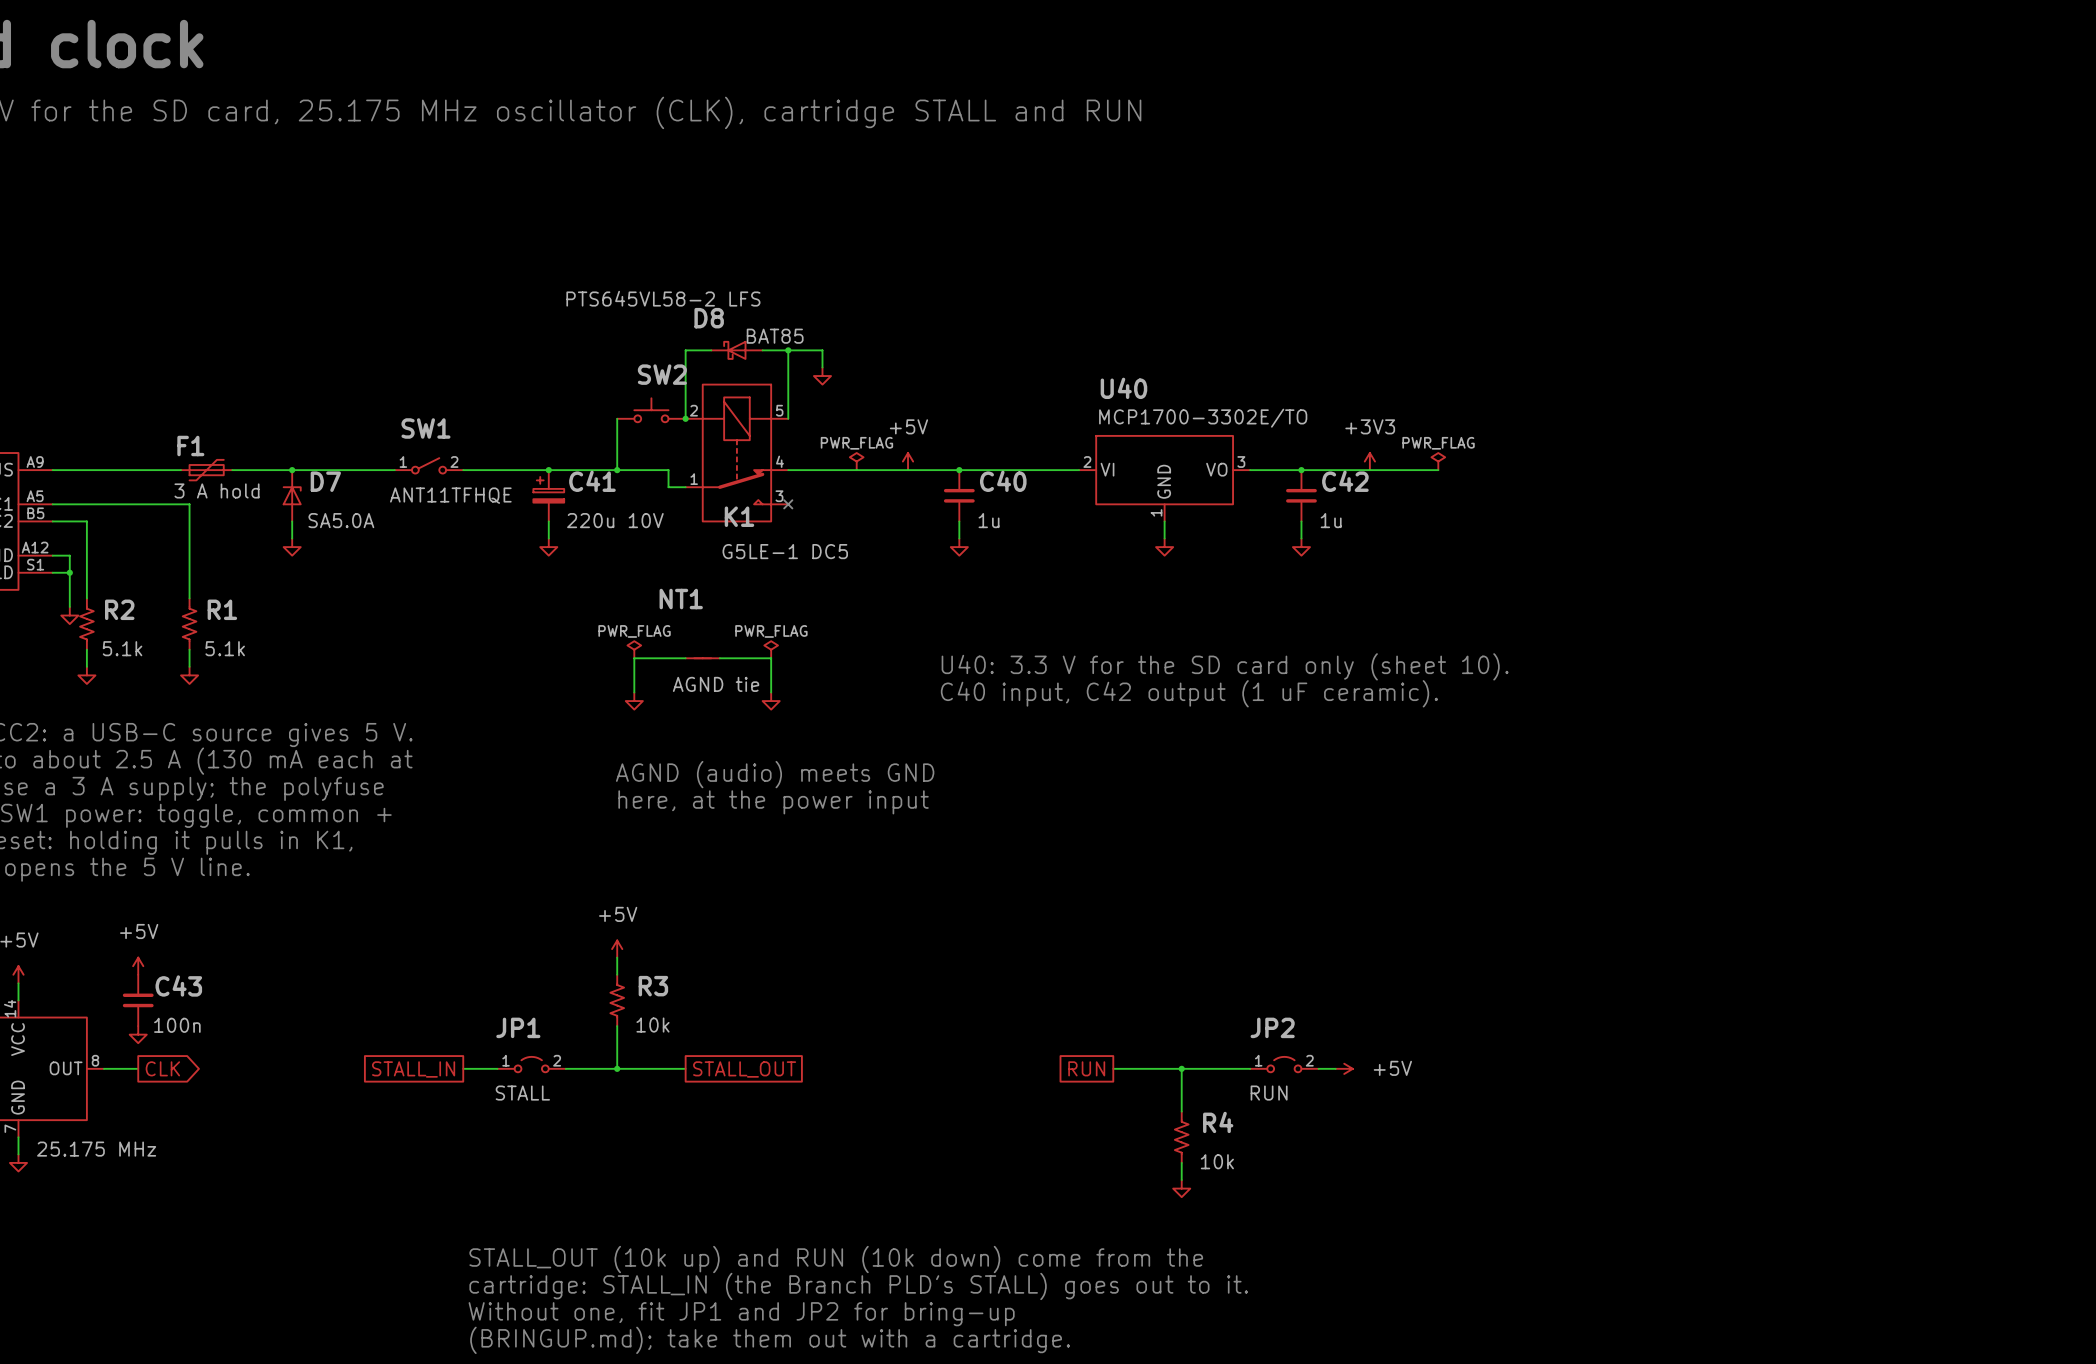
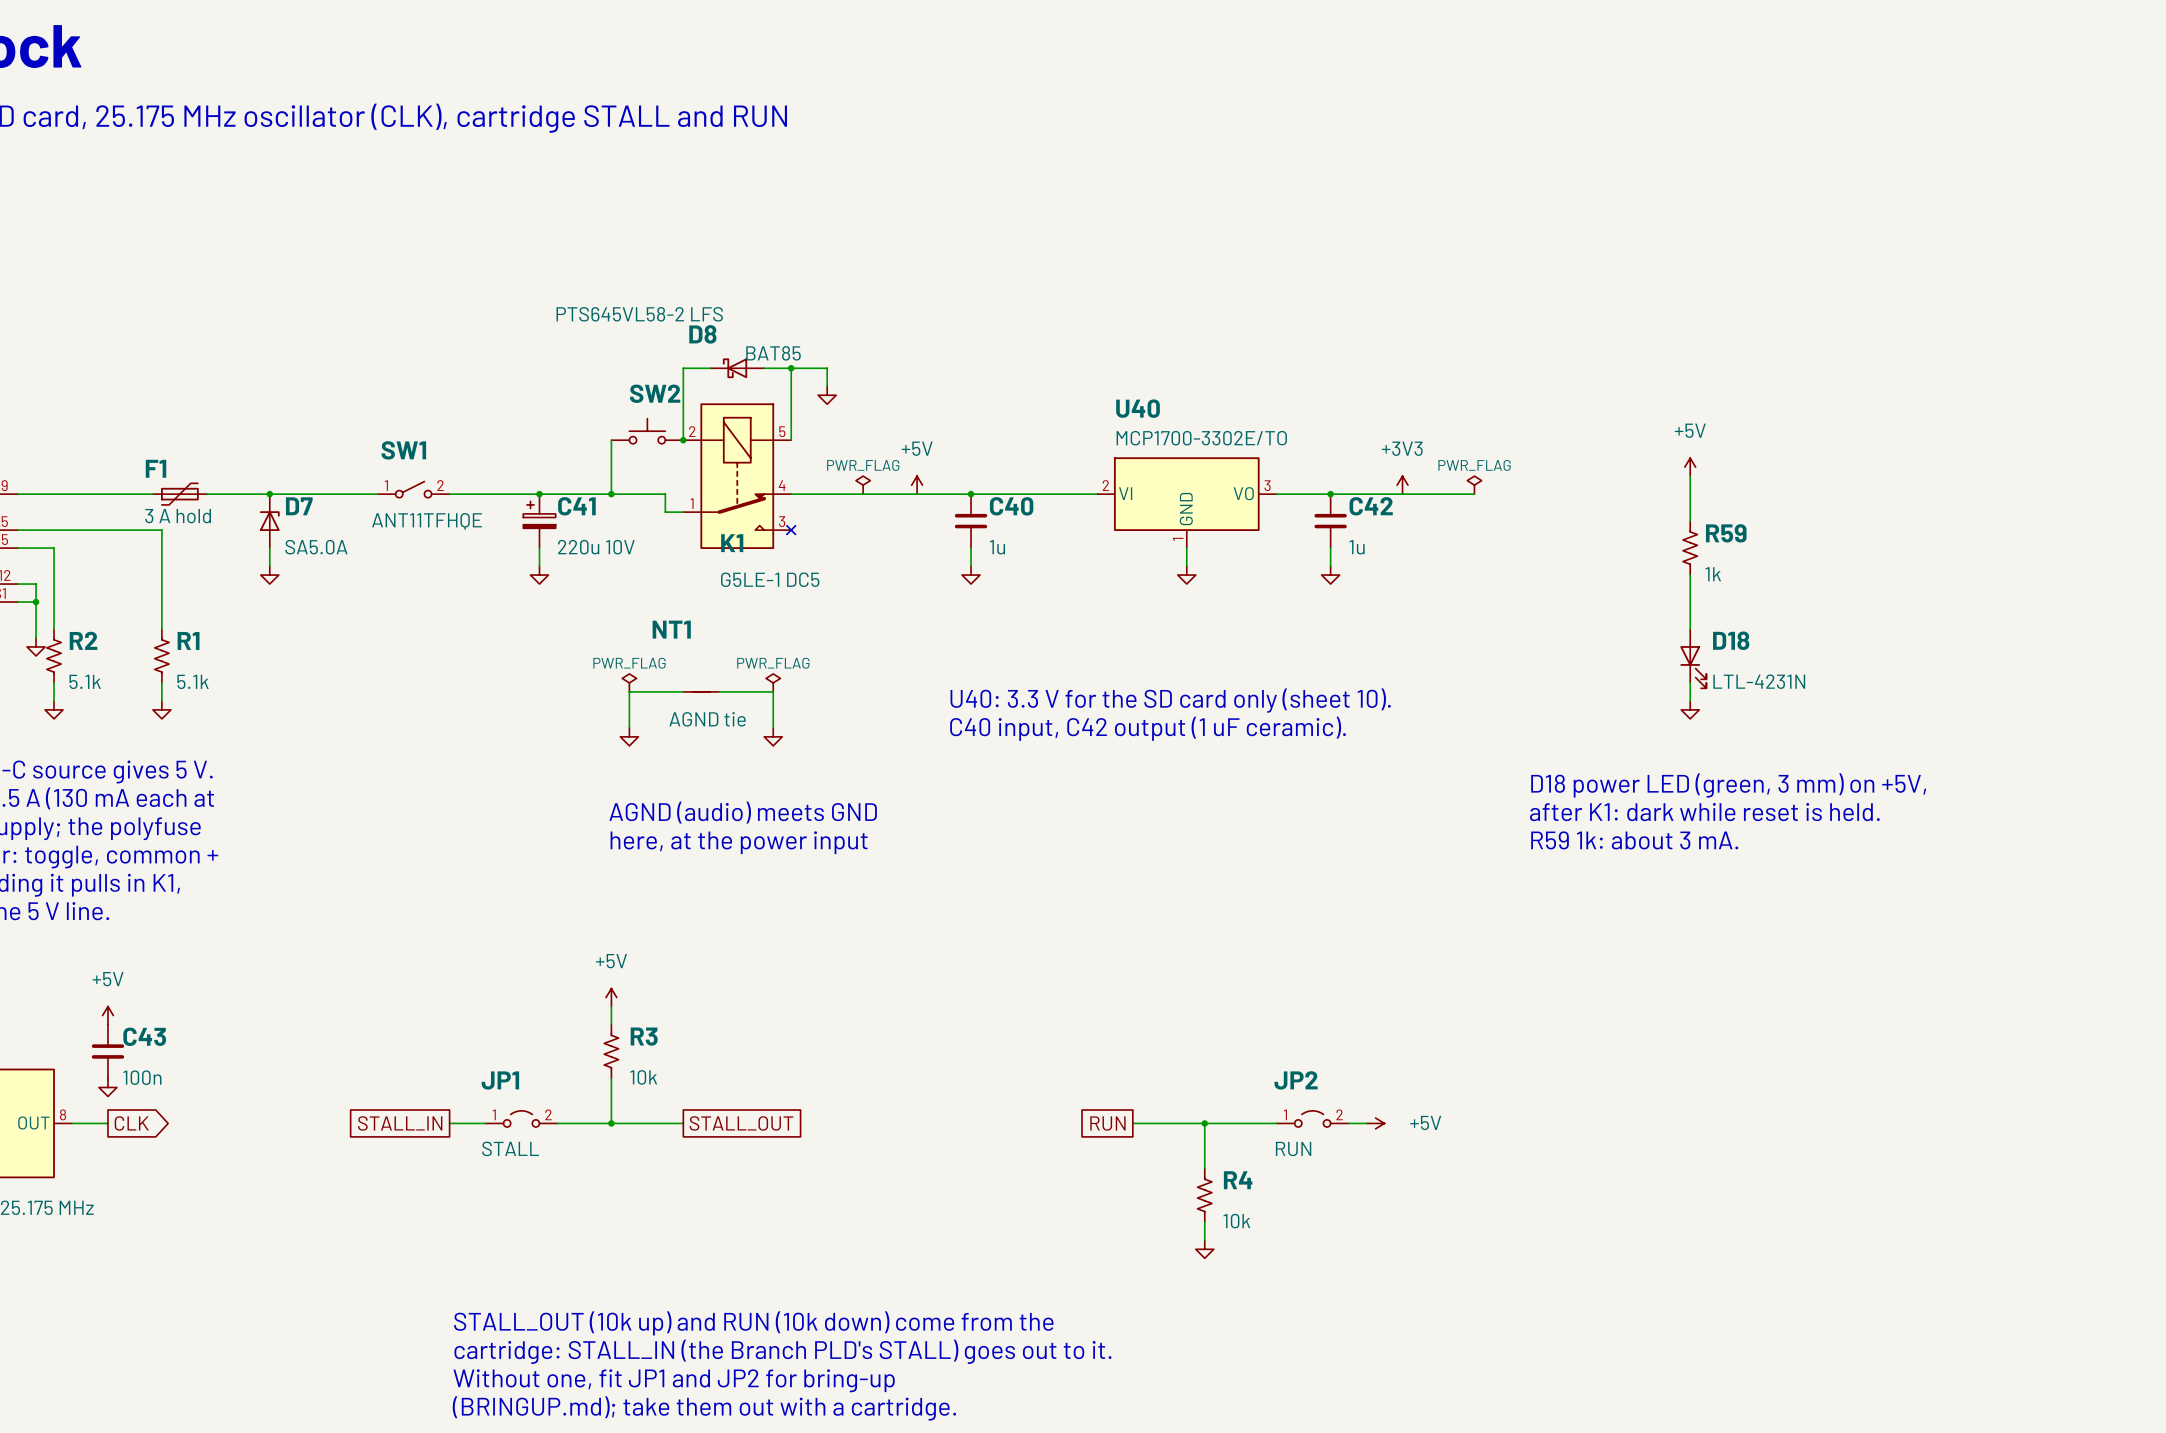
power symbol: none -> +5V (1690, 467)
wire: none -> (1690, 476) (1690, 521)
R59: none -> 1k (1690, 548)
wire: none -> (1690, 575) (1690, 628)
D18: none -> LTL-4231N (1693, 658)
wire: none -> (1690, 682) (1690, 700)
power symbol: none -> (1690, 709)
text: none -> D18 power LED (green, 3 mm) on +5V, (1728, 785)
text: none -> after K1: dark while reset is held. (1704, 812)
text: none -> R59 1k: about 3 mA. (1634, 840)

